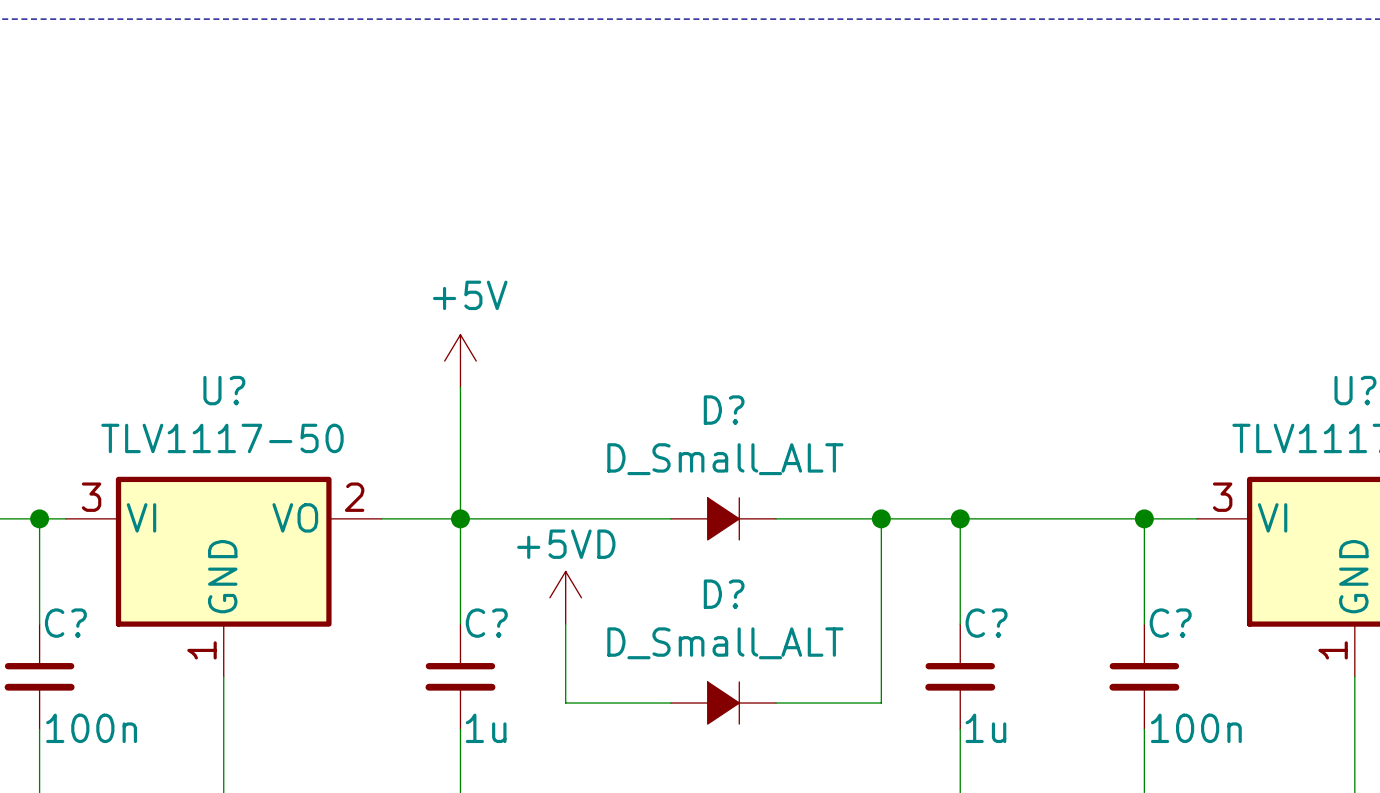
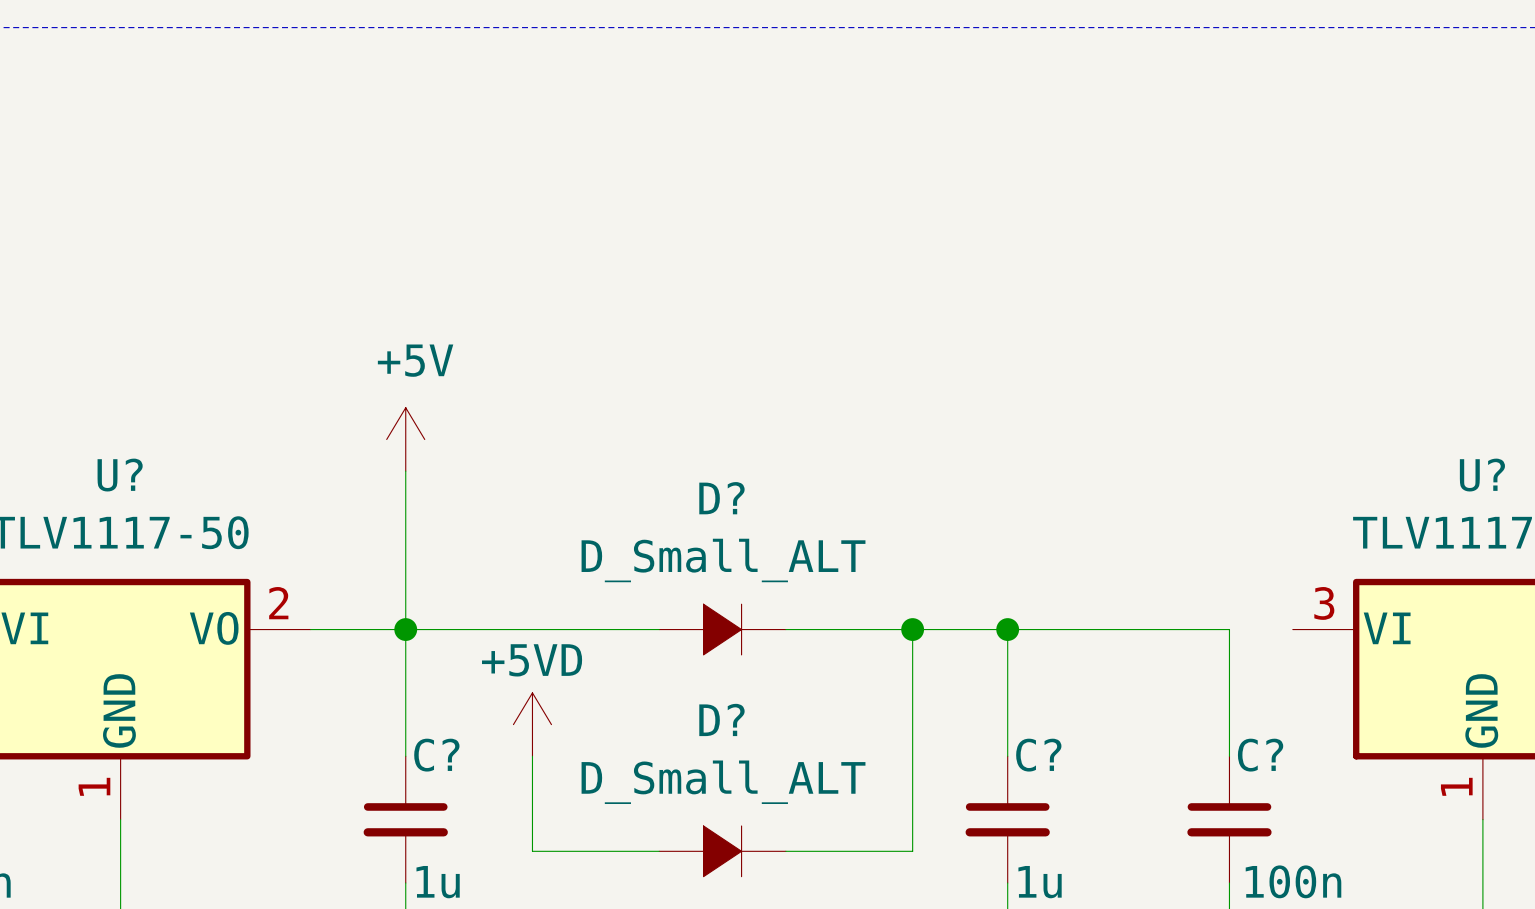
wire: (1144, 518) (1196, 518) -> none
junction: (1144, 518) -> none

